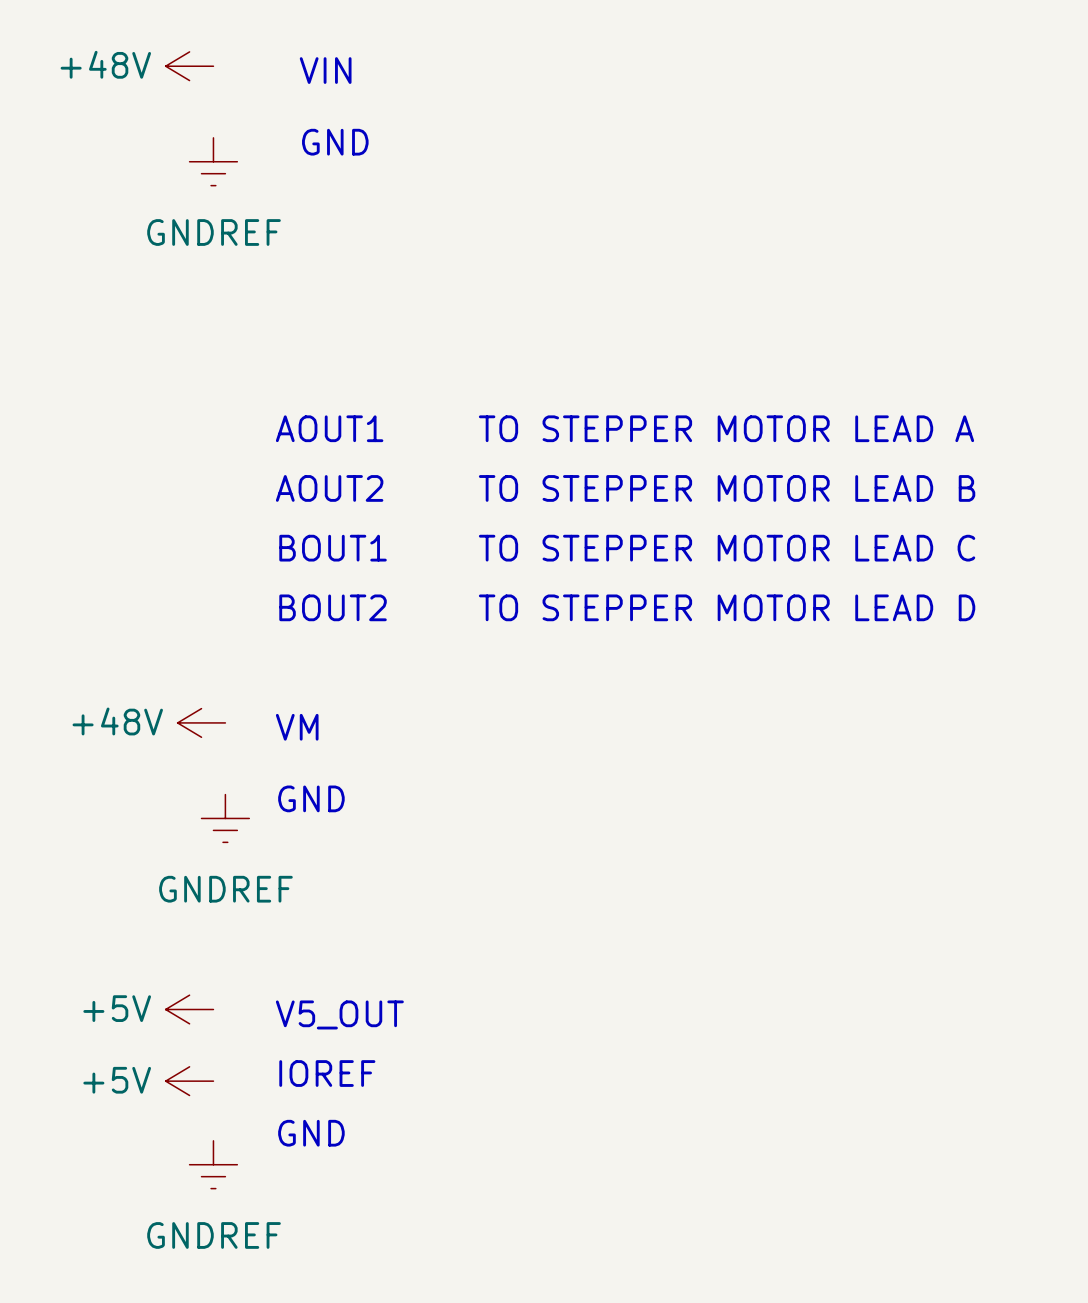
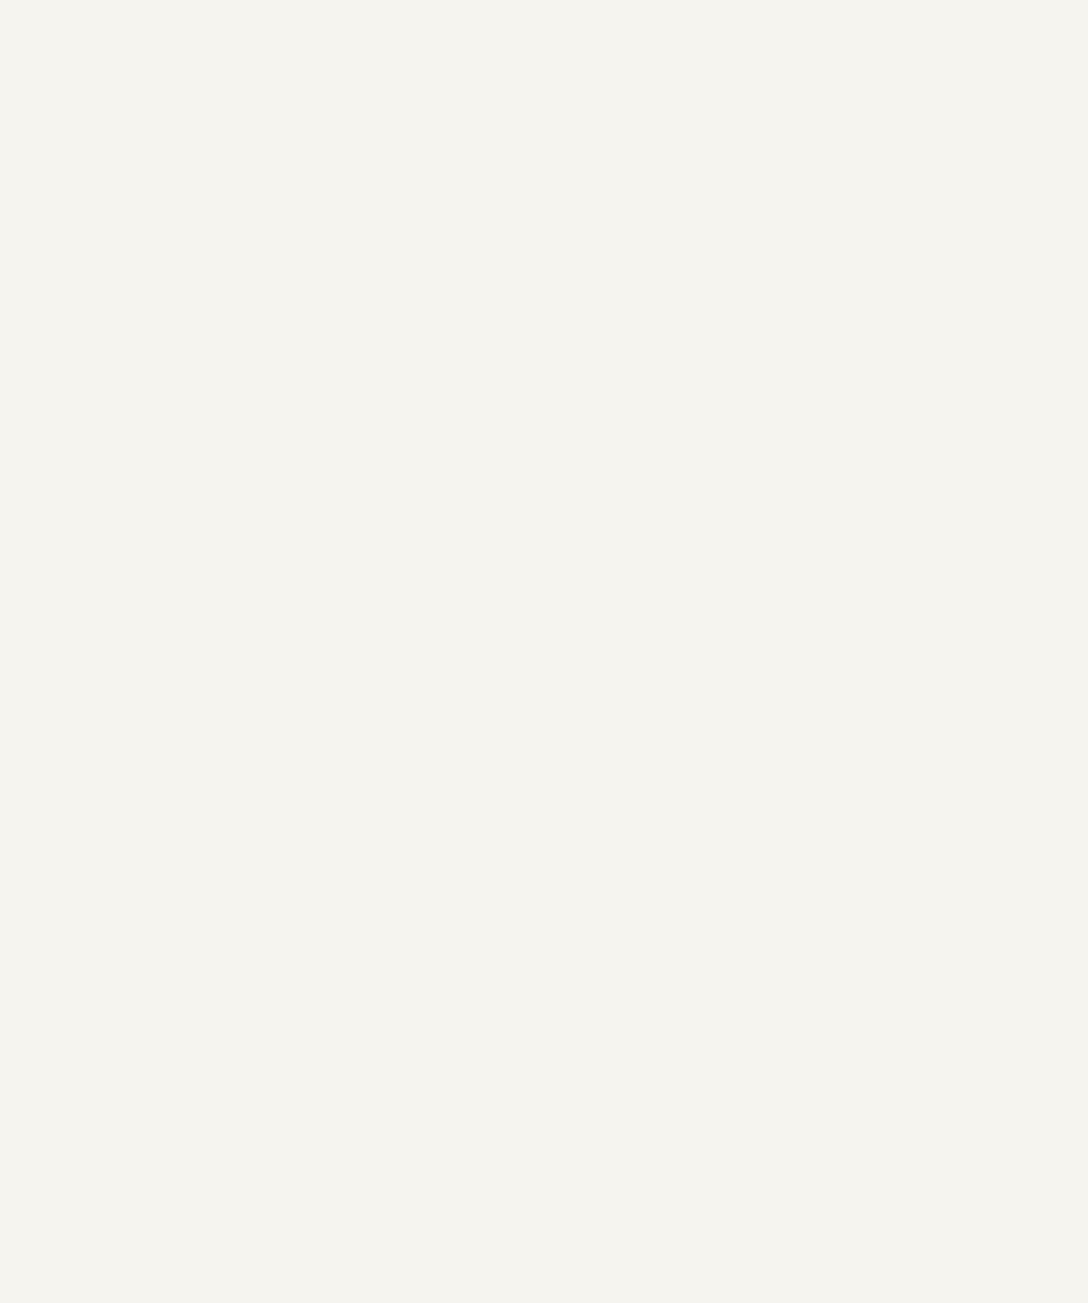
power symbol: +48V (189, 66) -> none
text: VIN (325, 70) -> none
text: GND (335, 142) -> none
power symbol: GNDREF (213, 161) -> none
text: AOUT1 (329, 428) -> none
text: TO STEPPER MOTOR LEAD A (726, 428) -> none
text: AOUT2 (329, 488) -> none
text: TO STEPPER MOTOR LEAD B (727, 488) -> none
text: BOUT1 (333, 548) -> none
text: TO STEPPER MOTOR LEAD C (727, 548) -> none
text: BOUT2 (333, 607) -> none
text: TO STEPPER MOTOR LEAD D (727, 607) -> none
power symbol: +48V (201, 722) -> none
text: VM (297, 727) -> none
text: GND (311, 798) -> none
power symbol: GNDREF (225, 818) -> none
power symbol: +5V (189, 1009) -> none
text: V5_OUT (339, 1014) -> none
text: IOREF (327, 1073) -> none
power symbol: +5V (189, 1081) -> none
text: GND (311, 1133) -> none
power symbol: GNDREF (213, 1164) -> none

